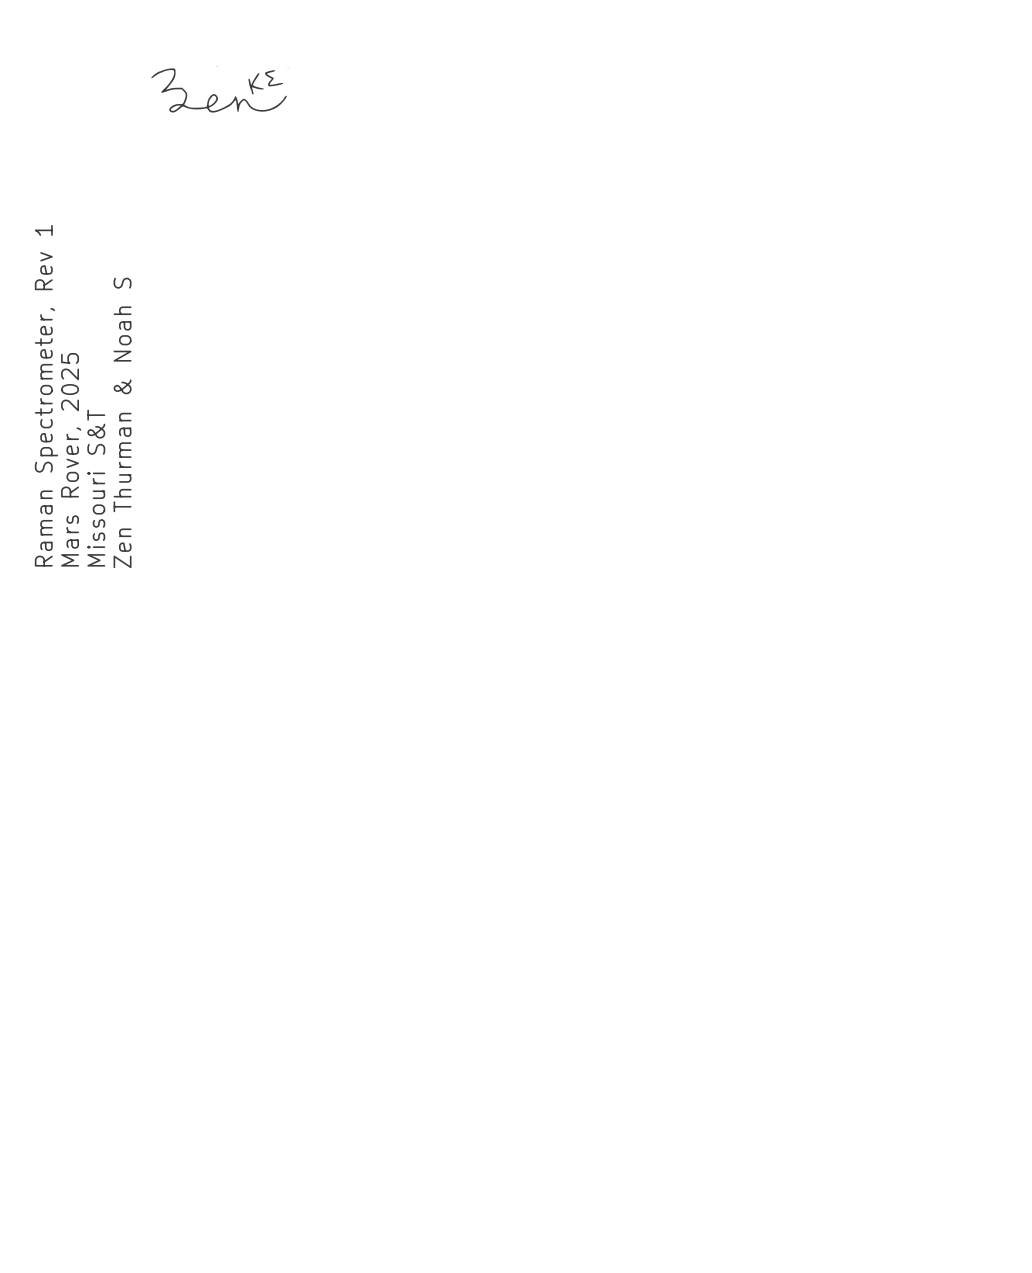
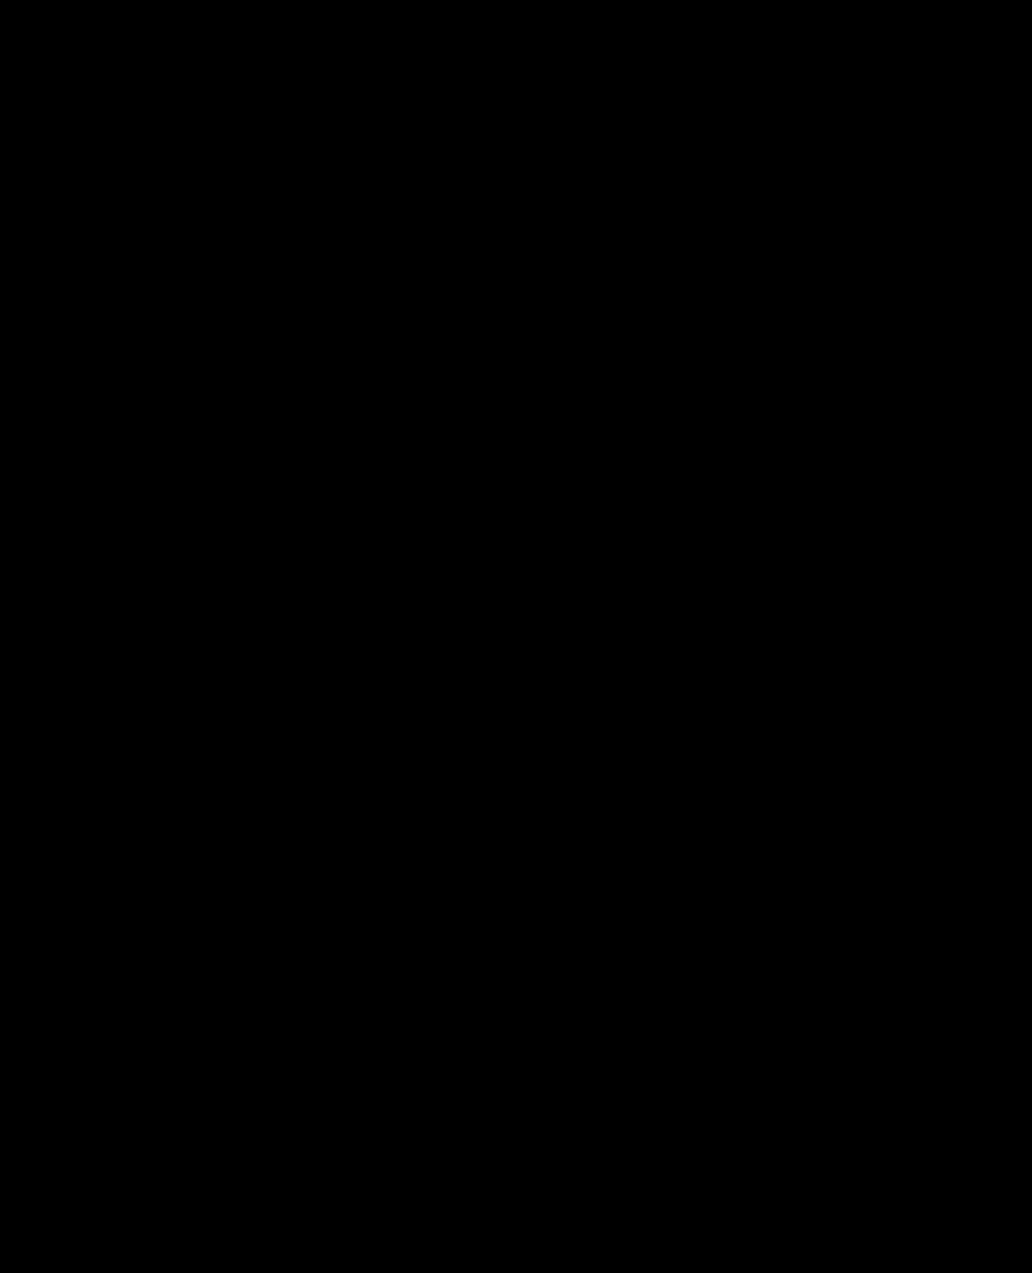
drawing: [151, 65, 290, 113] -> none
text: Raman Spectrometer, Rev 1 (46, 395) -> none
text: Zen Thurman & Noah S (122, 422) -> none
text: Mars Rover, 2025 (71, 459) -> none
text: Missouri S&T (96, 488) -> none

